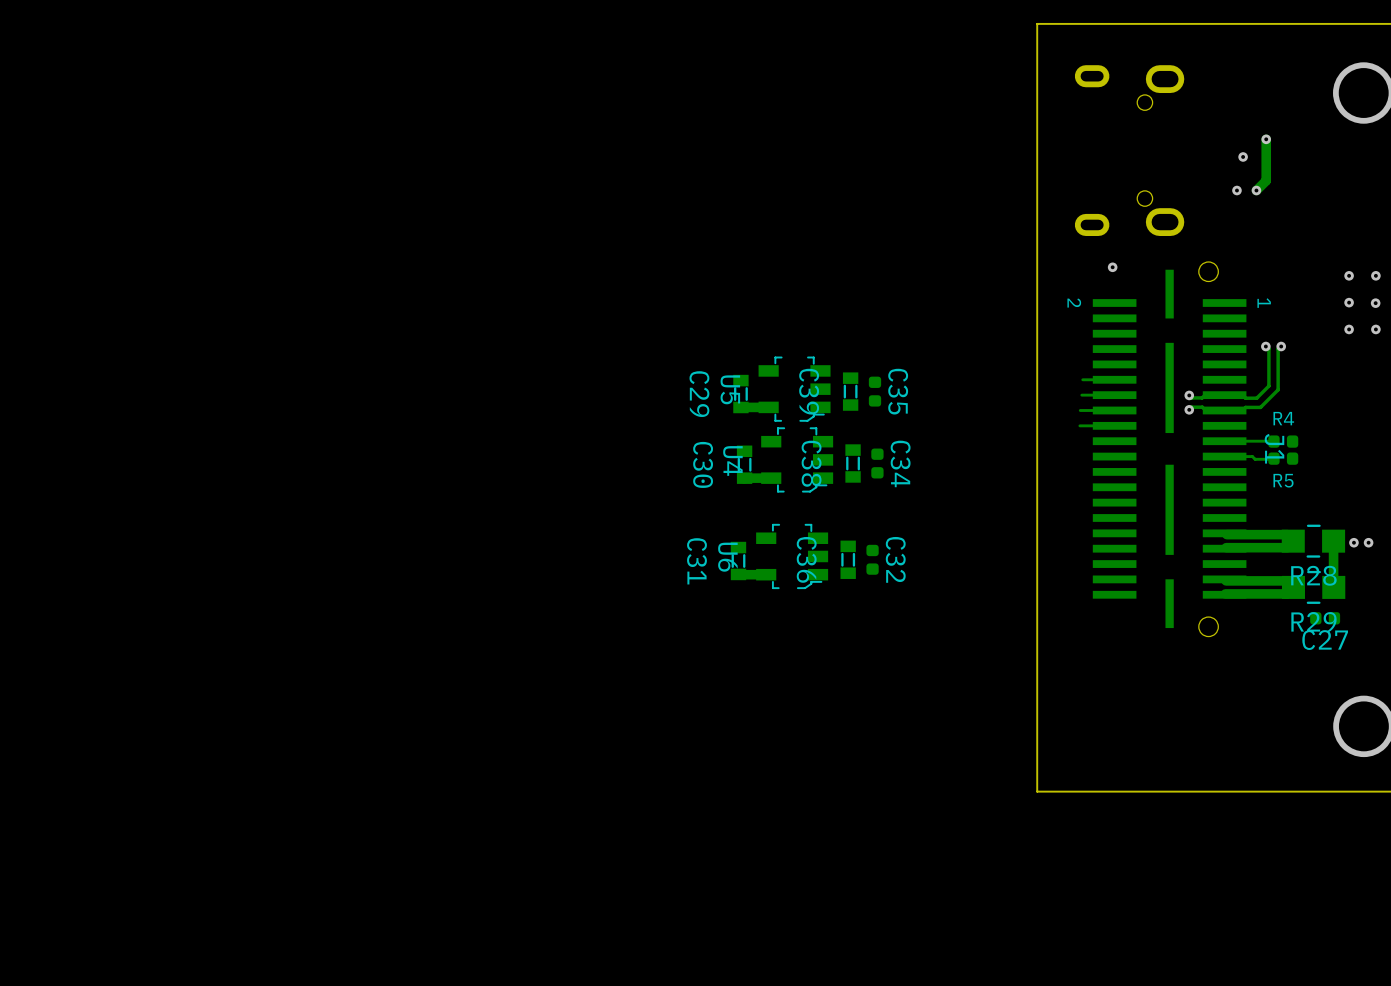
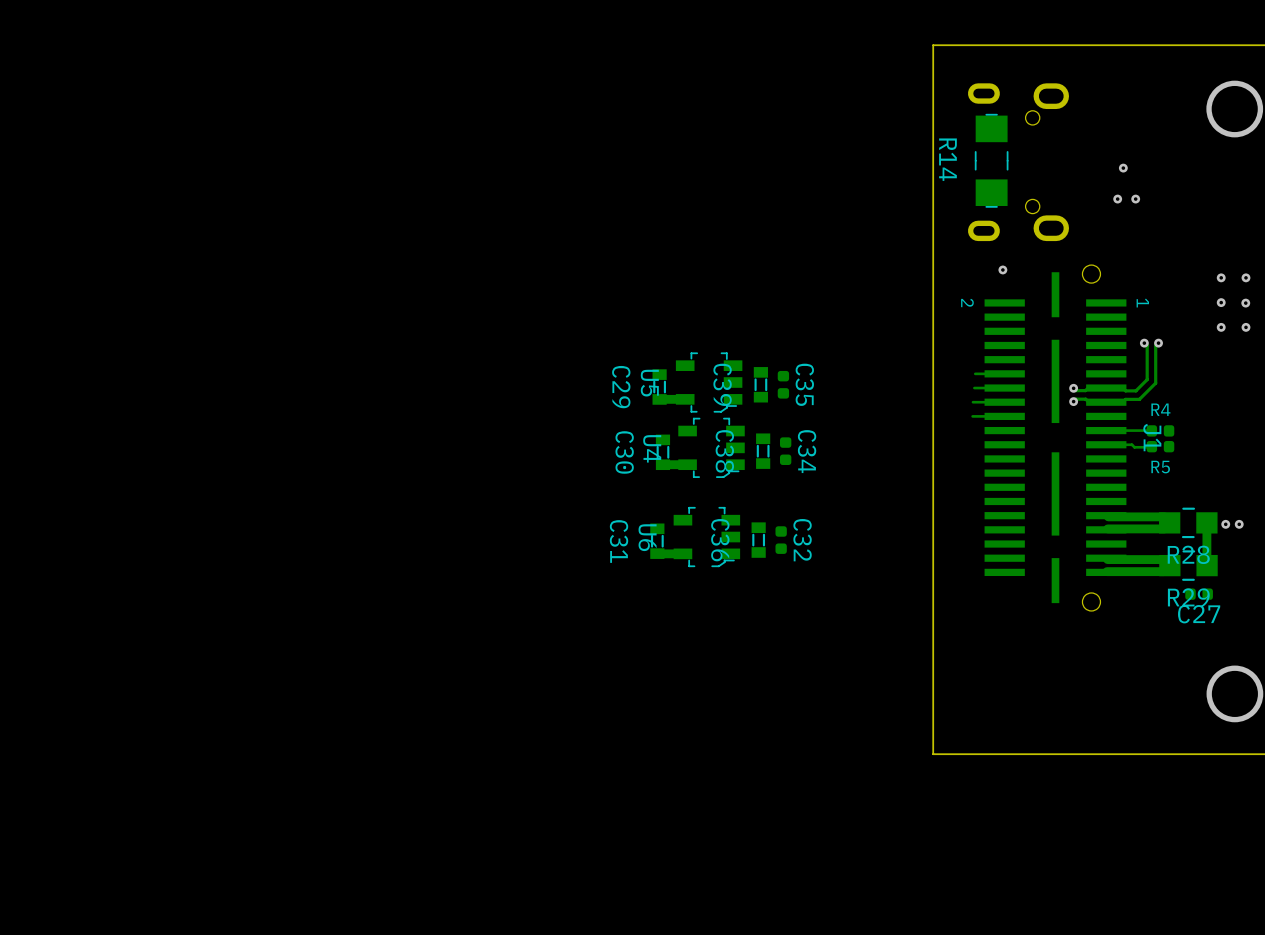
track: (1266, 139) (1266, 180) (1256, 190) -> none
via: (1266, 139) -> none
R14: none -> (991, 160)

